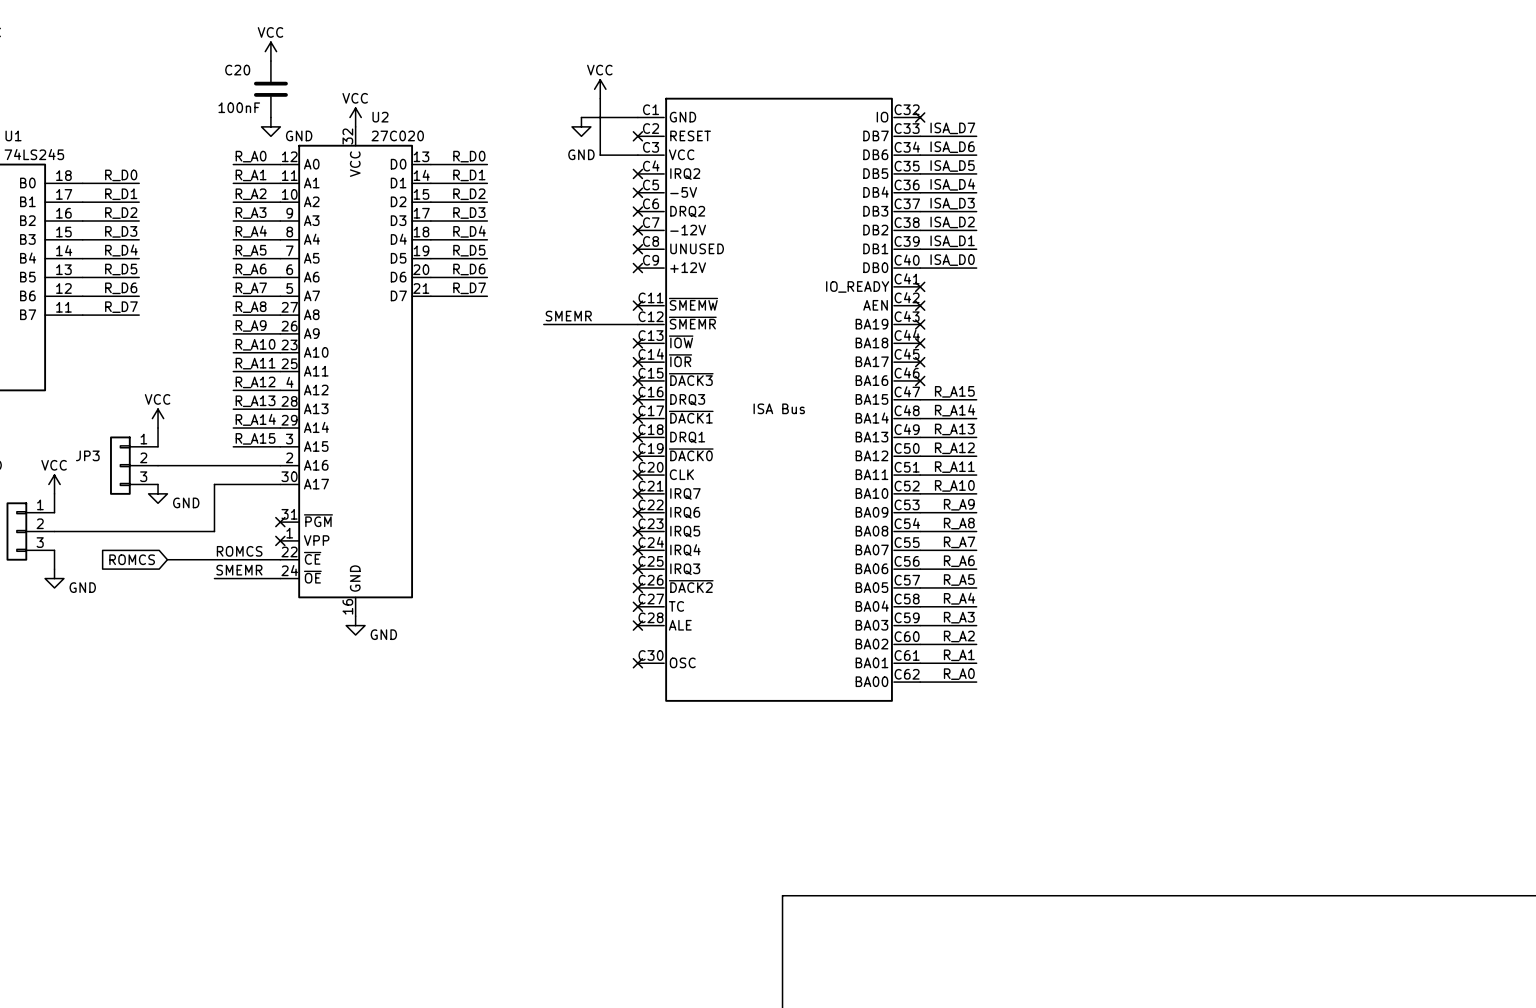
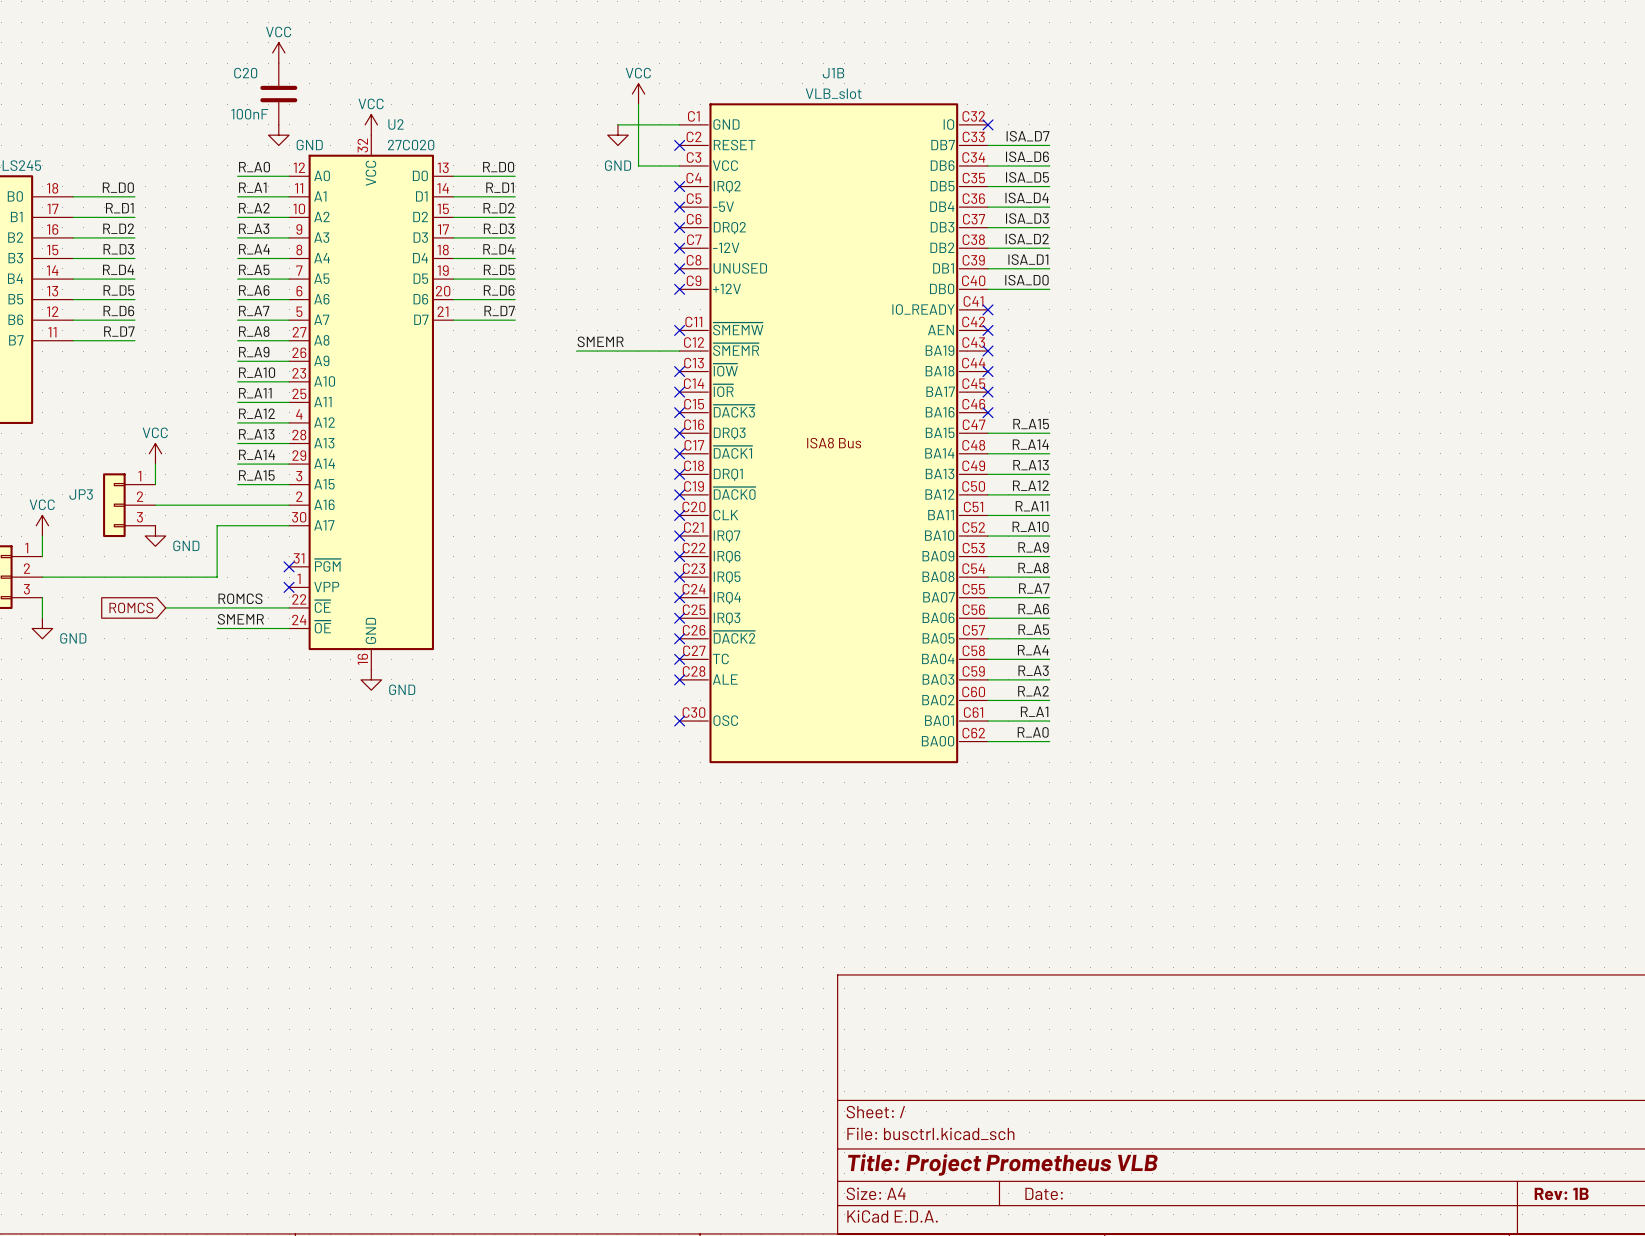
J1B name: none -> J1B (833, 73)
J1B value: none -> VLB_slot (833, 93)
J1B text: ISA Bus (779, 408) -> ISA8 Bus (834, 443)

